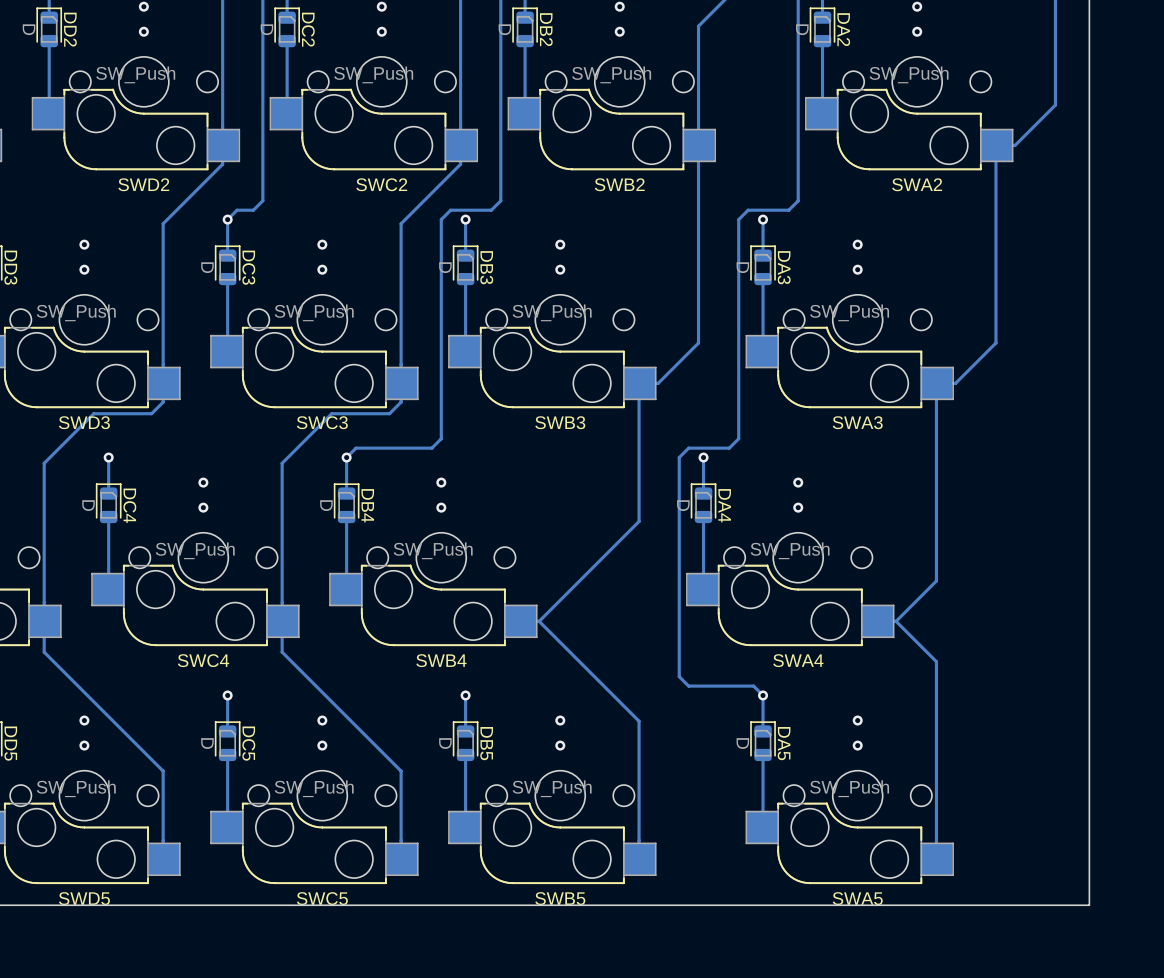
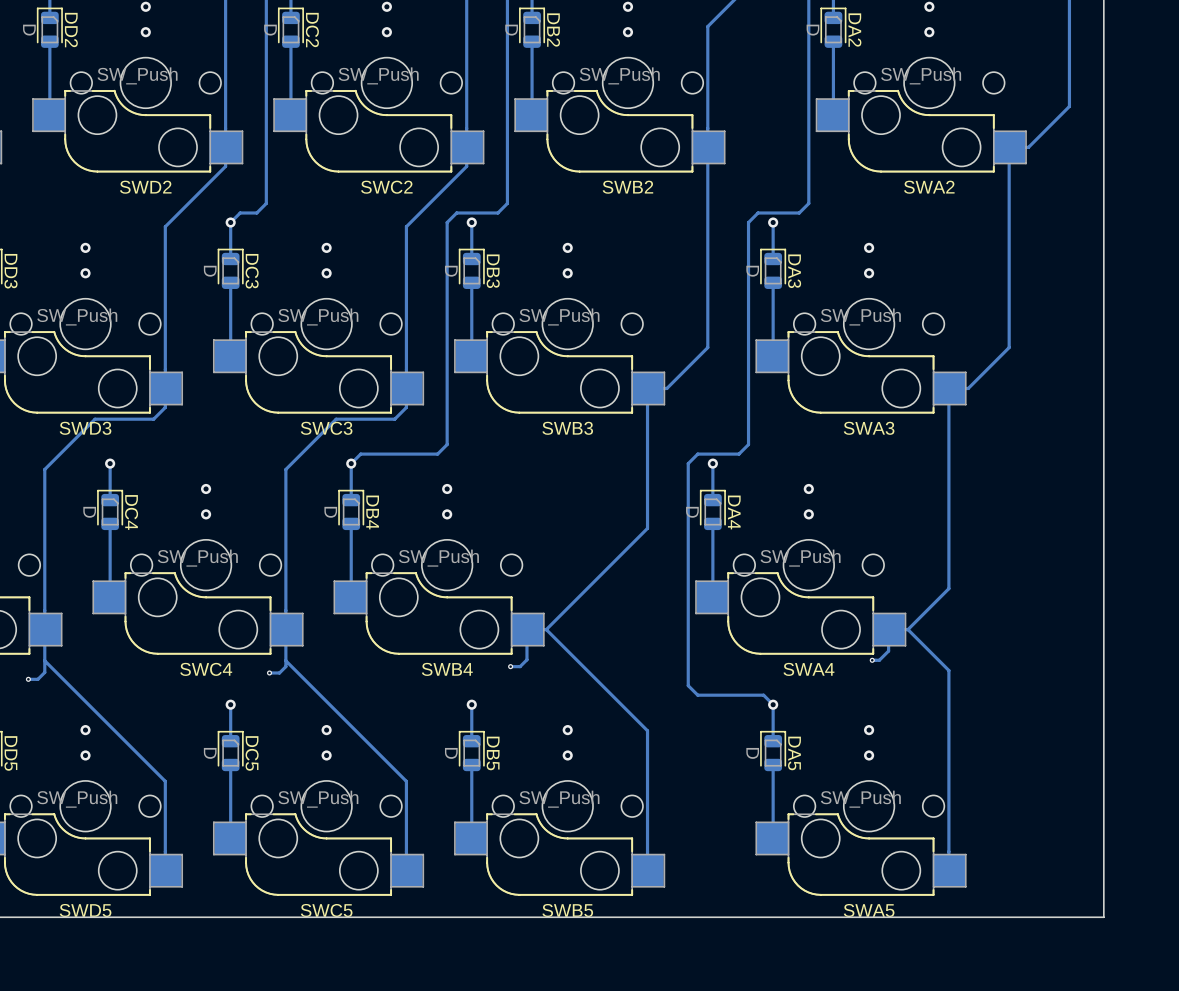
track: none -> (526, 629) (526, 659) (520, 666) (510, 666)
track: none -> (888, 629) (888, 651) (879, 660) (872, 660)
via: none -> (872, 660)
track: none -> (44, 660) (44, 672) (37, 679) (28, 679)
track: none -> (285, 660) (285, 666) (279, 672) (269, 672)
via: none -> (510, 666)
via: none -> (269, 672)
via: none -> (28, 679)

